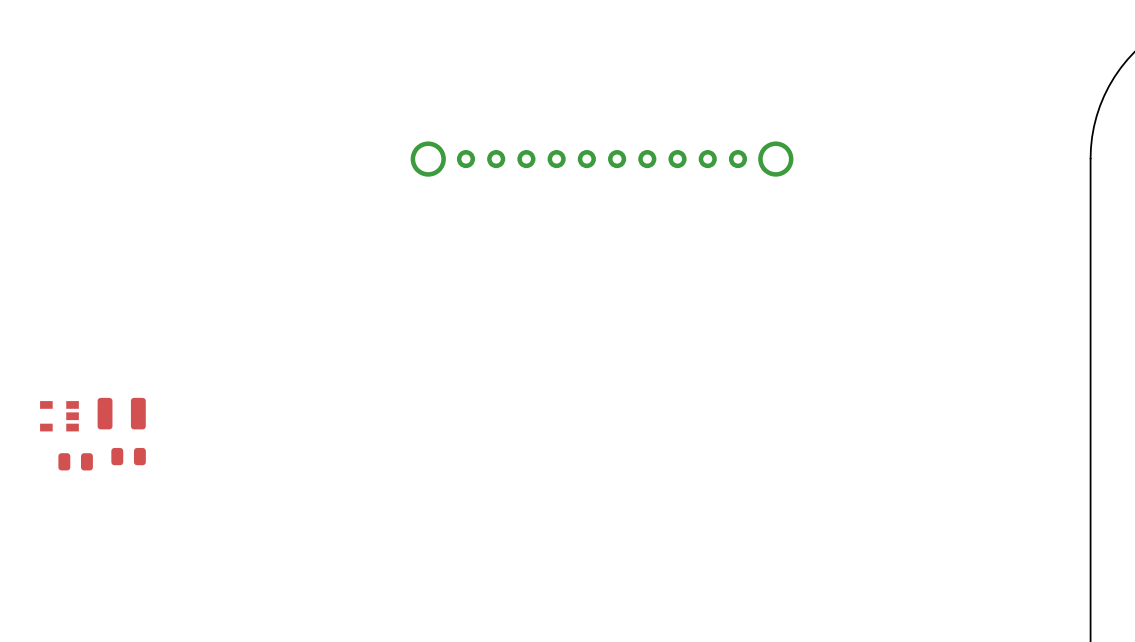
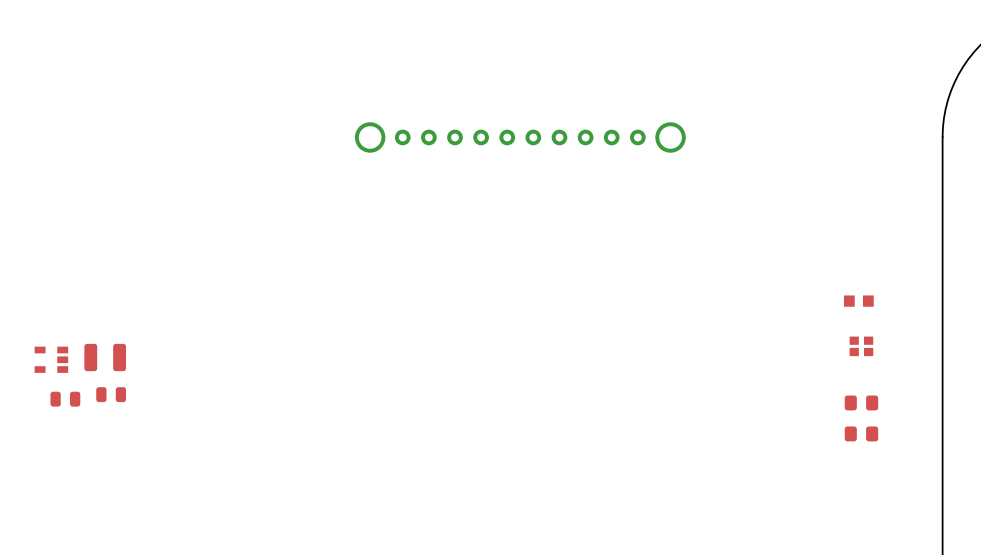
part: none -> (858, 301)
part: none -> (861, 346)
part: none -> (861, 402)
part: none -> (861, 433)

